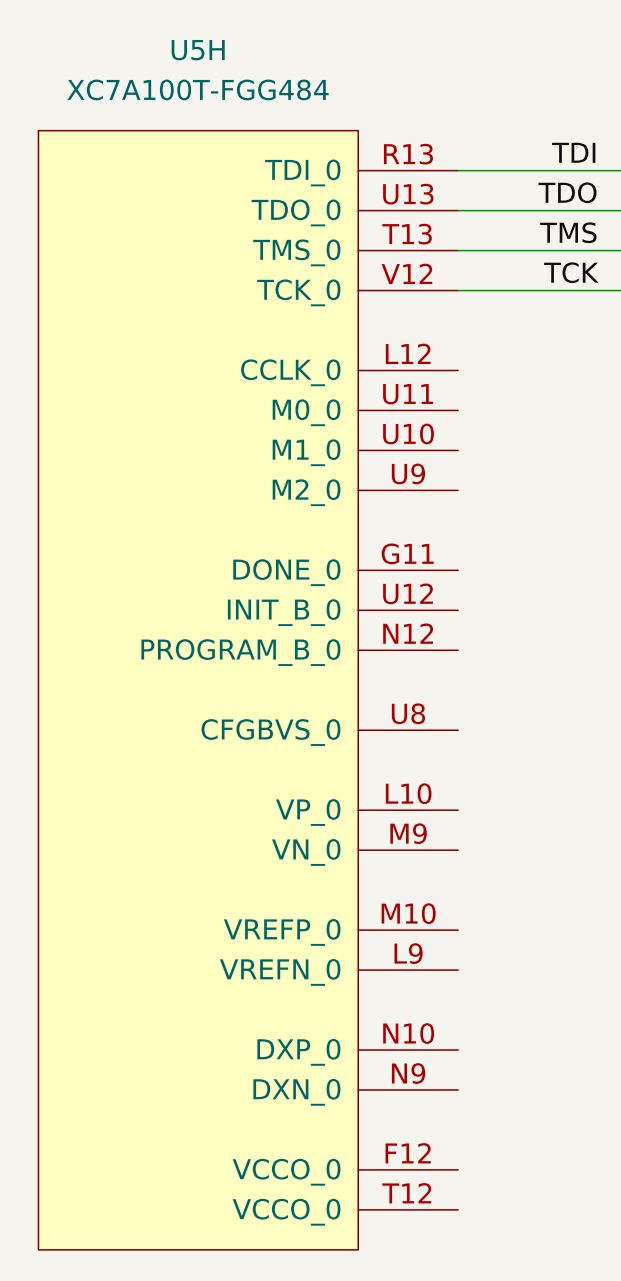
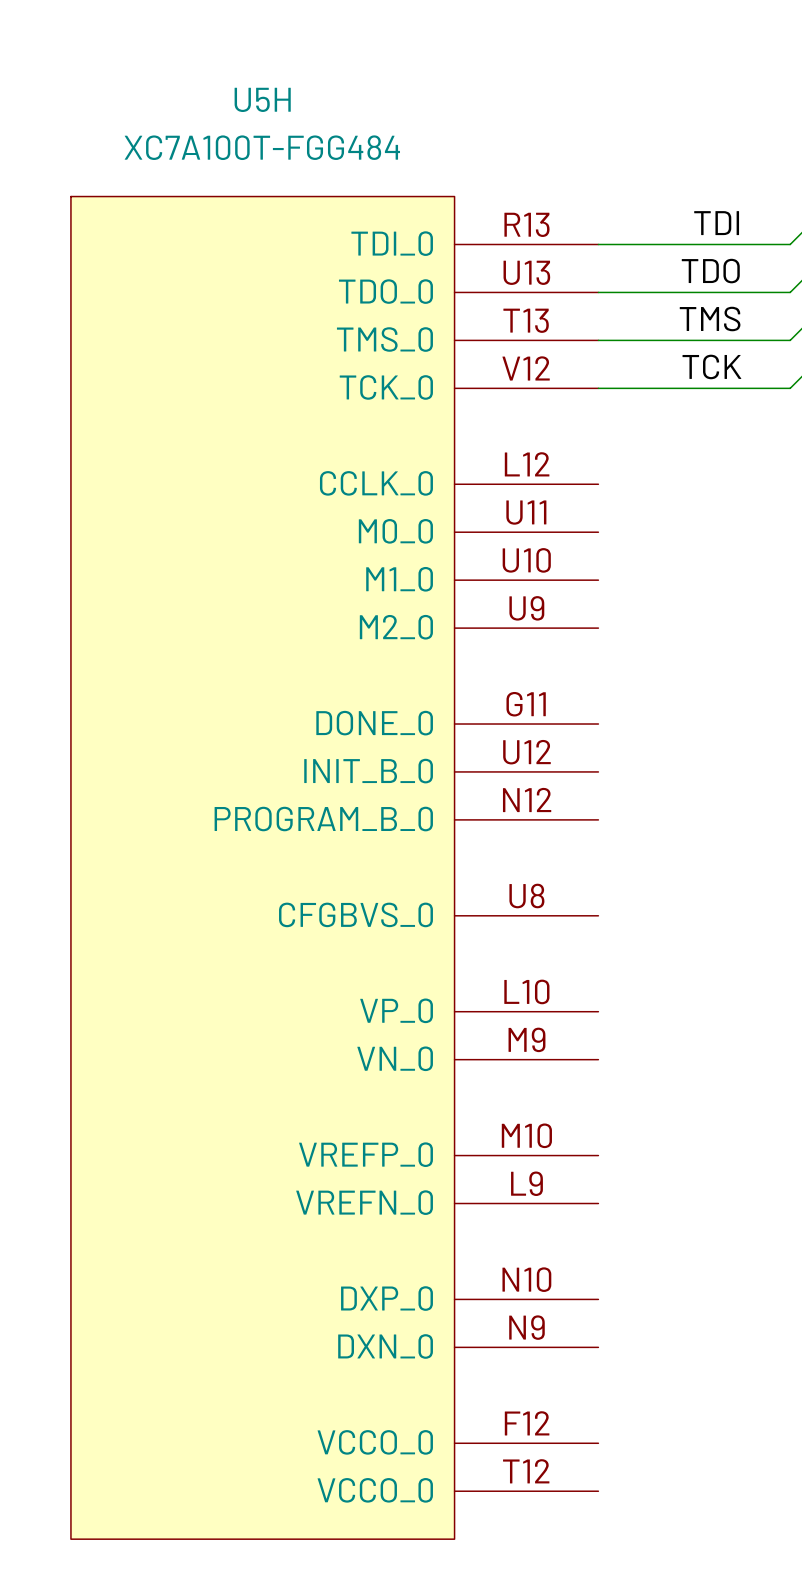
U5H symbol: [38, 130, 459, 1250] -> [70, 196, 599, 1540]

